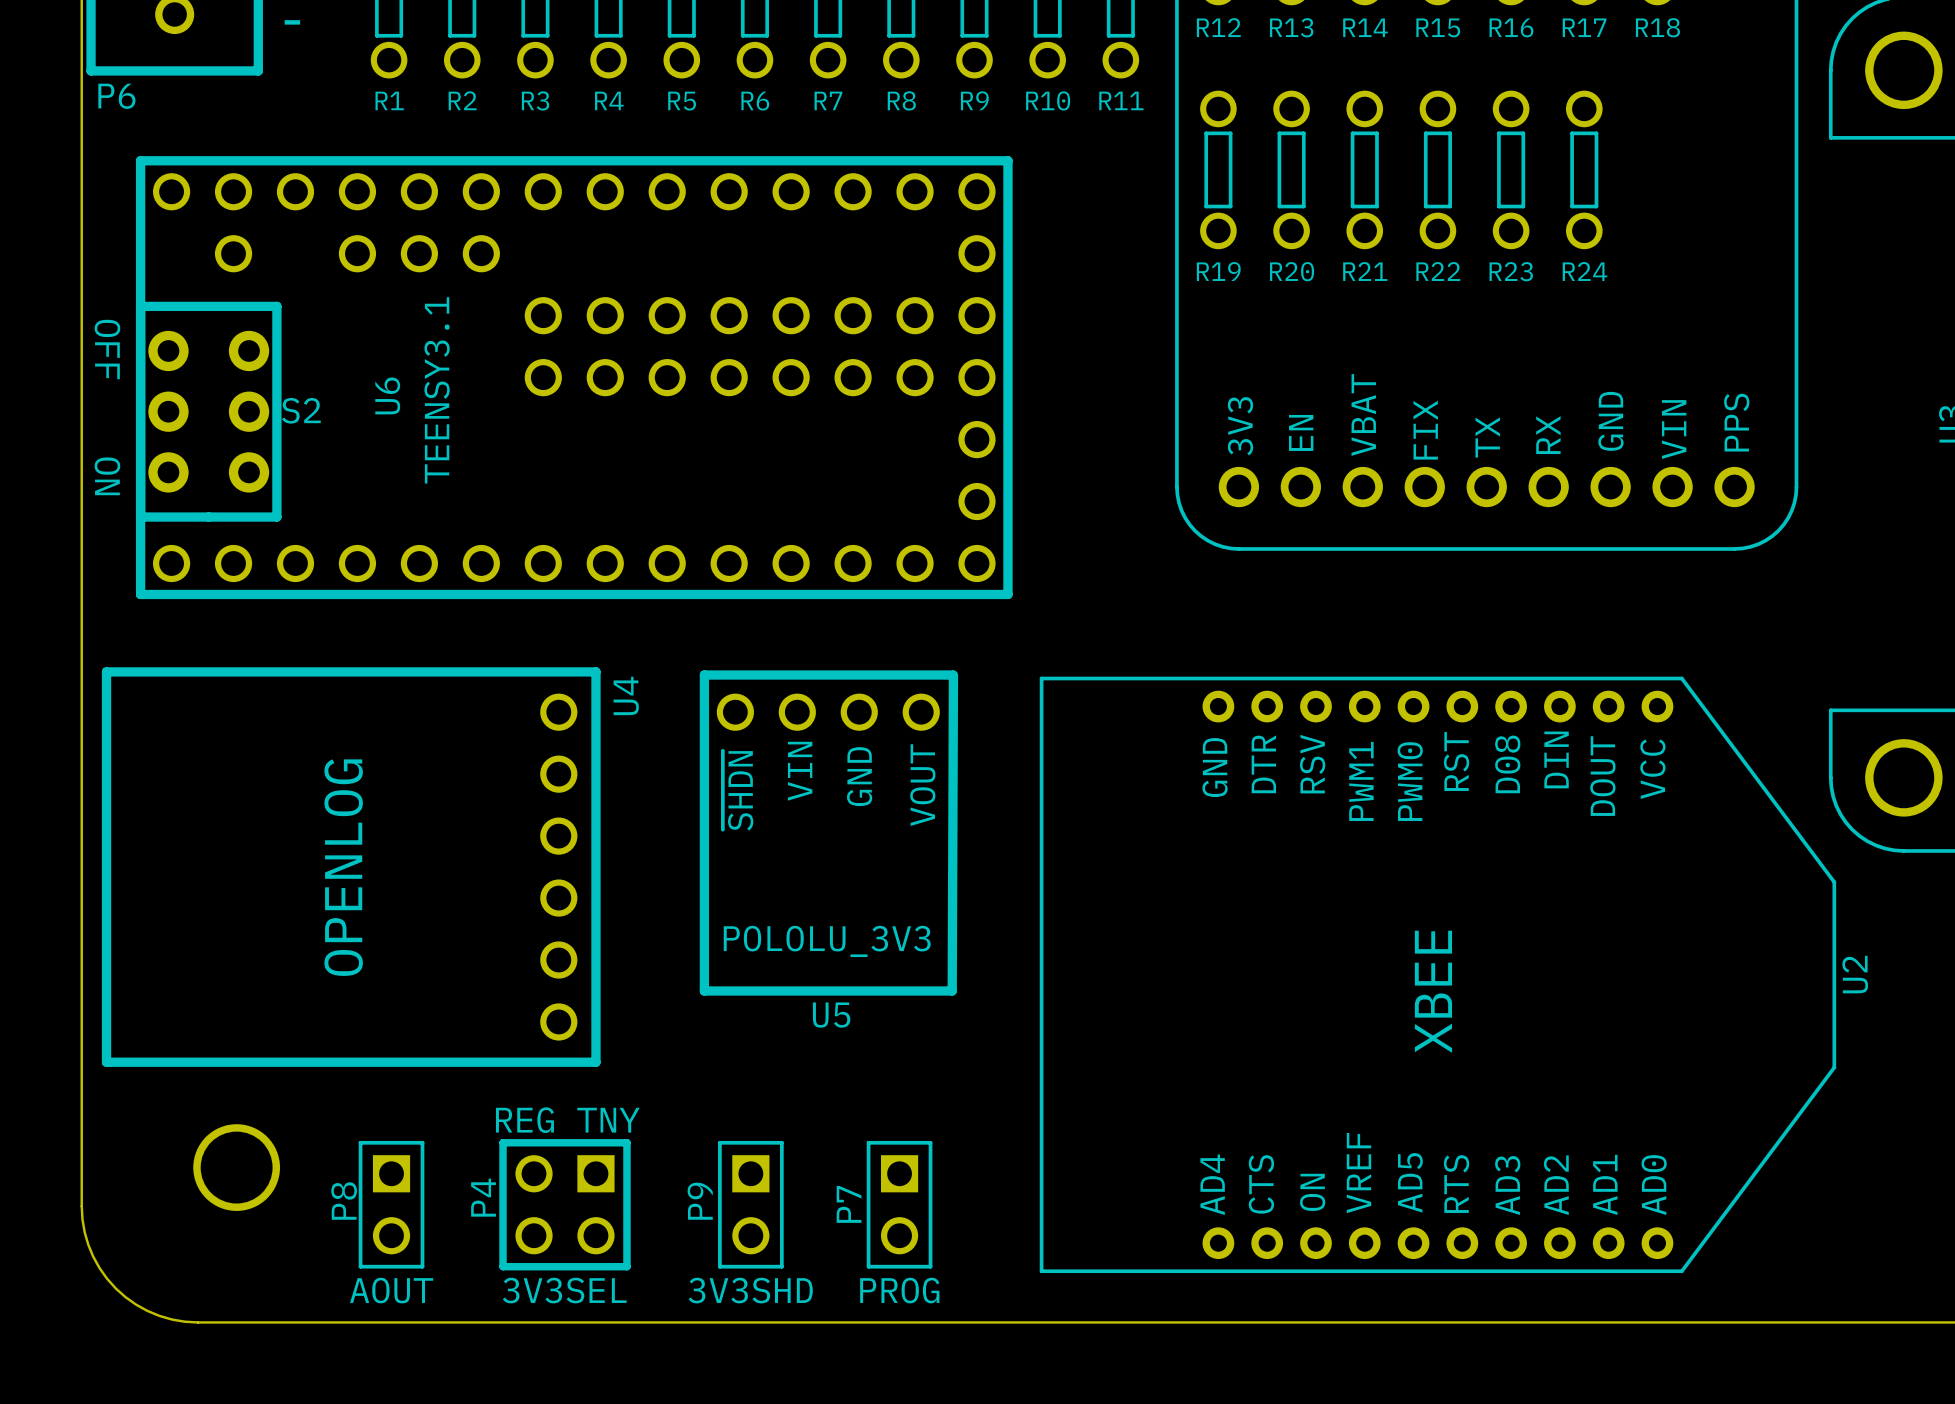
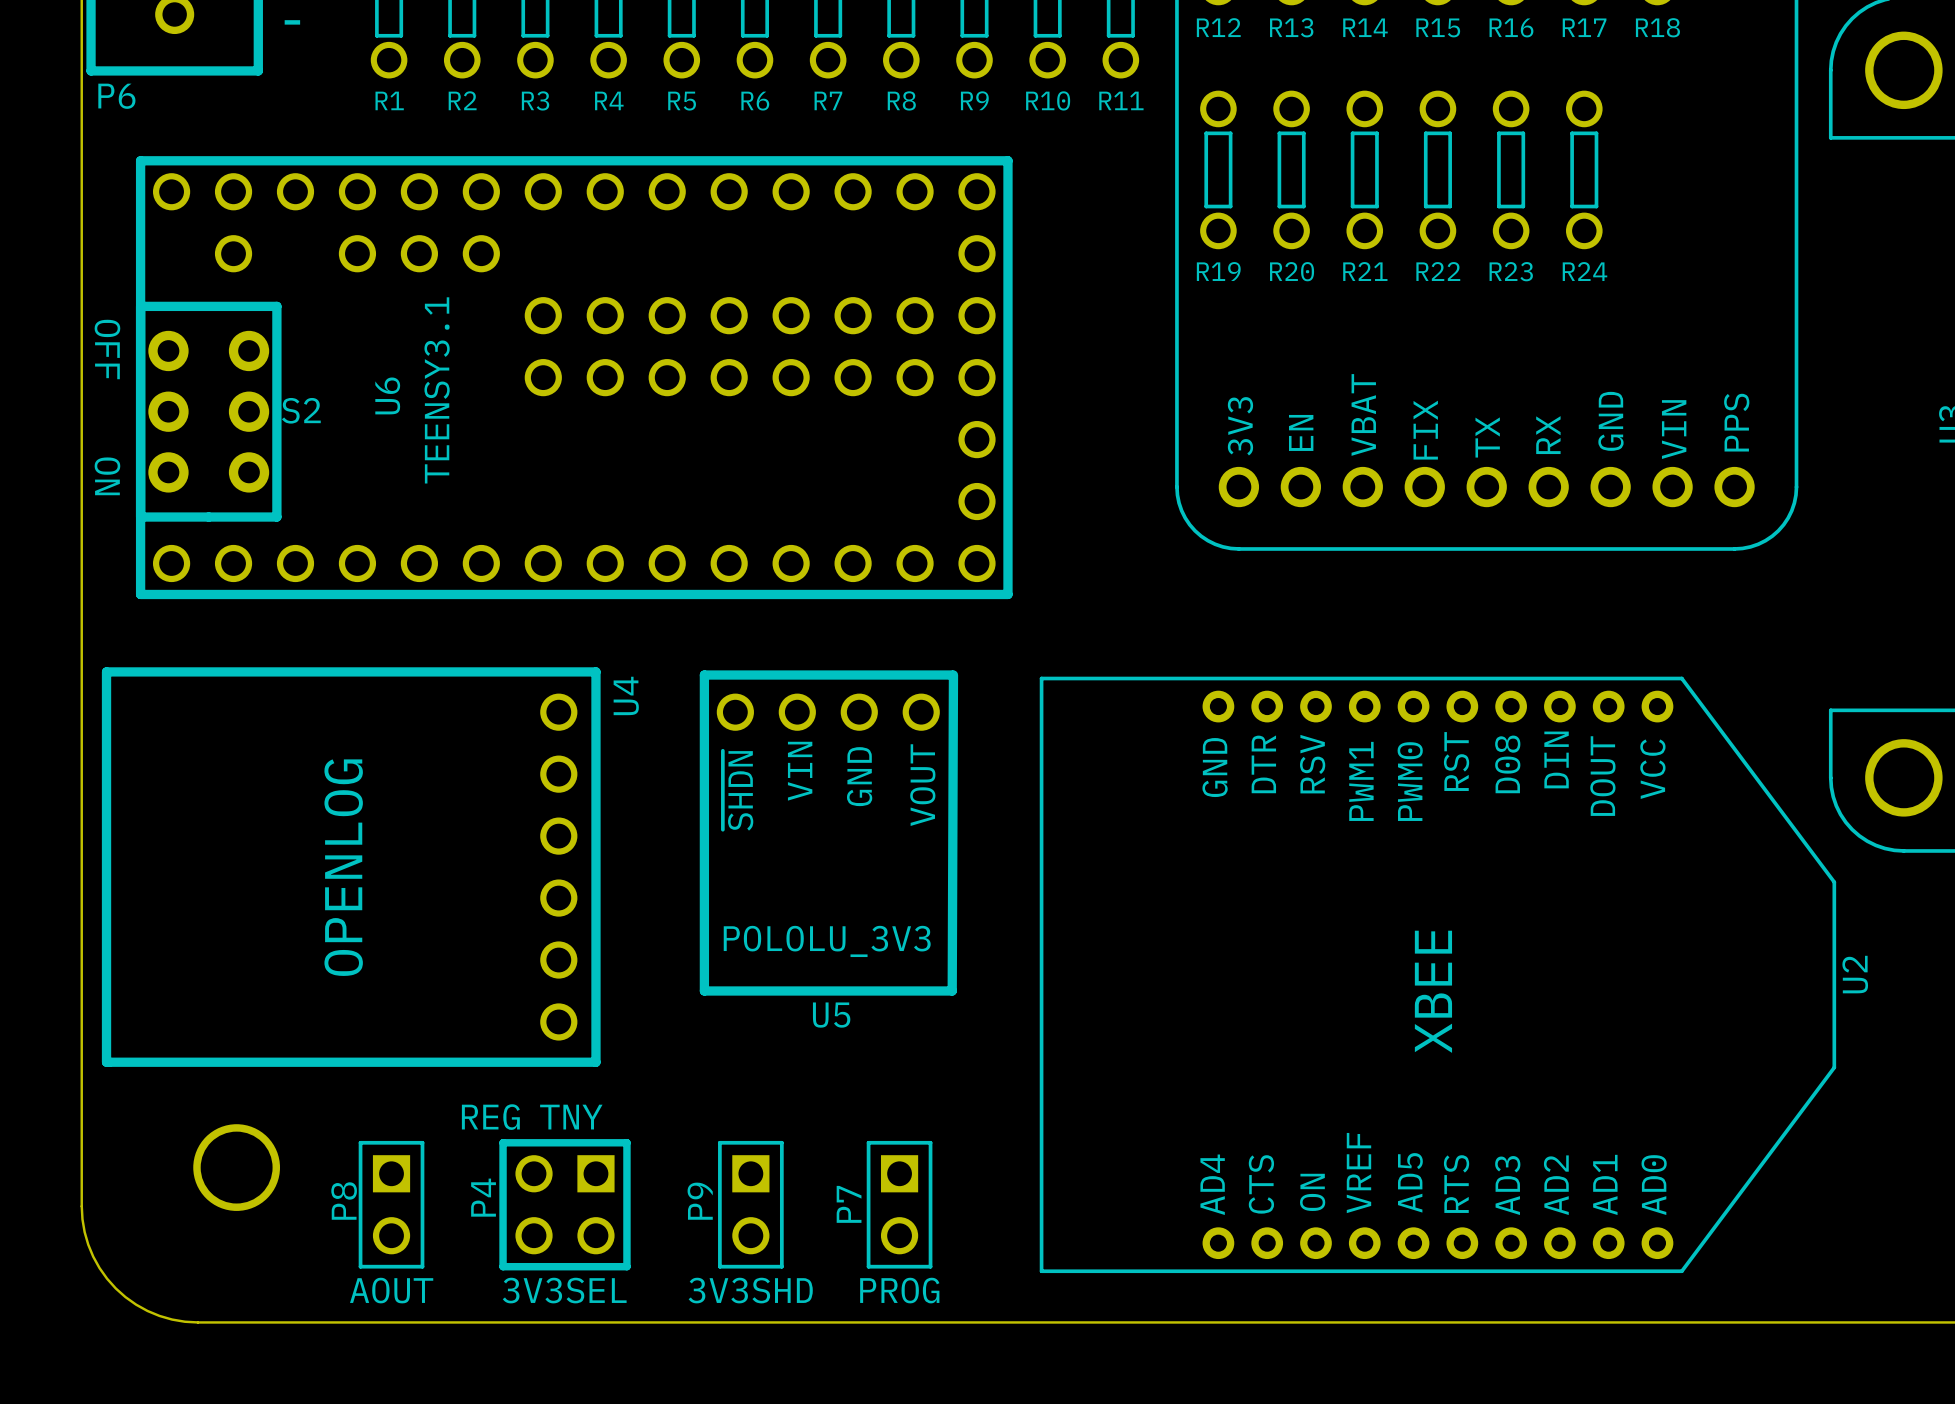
text position: REG (524, 1120) -> REG (490, 1117)
text position: TNY (608, 1120) -> TNY (571, 1117)

